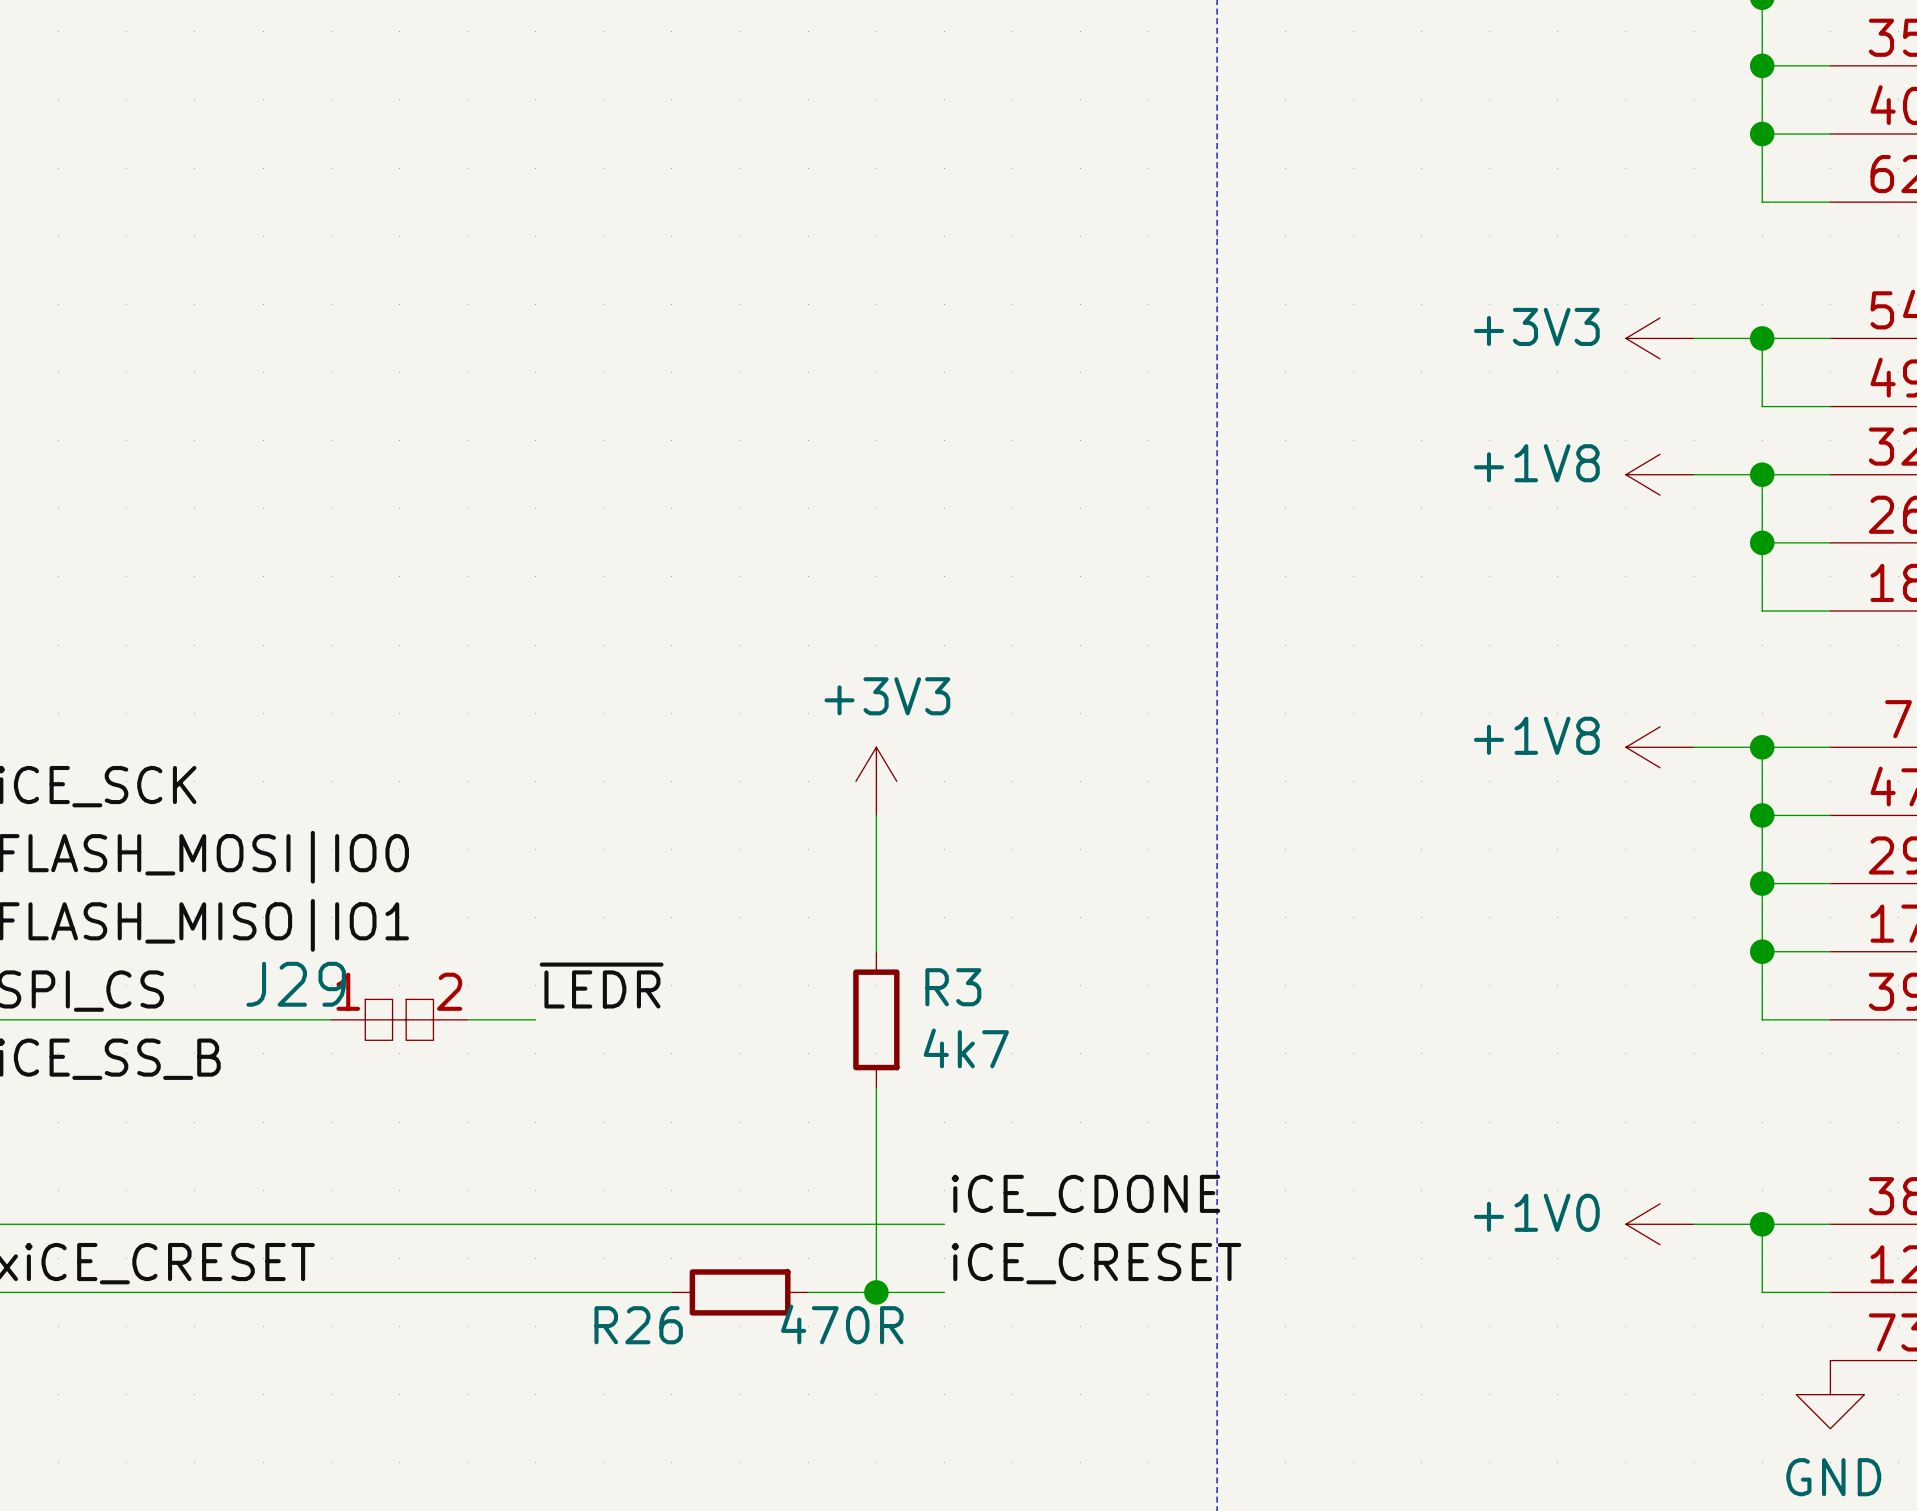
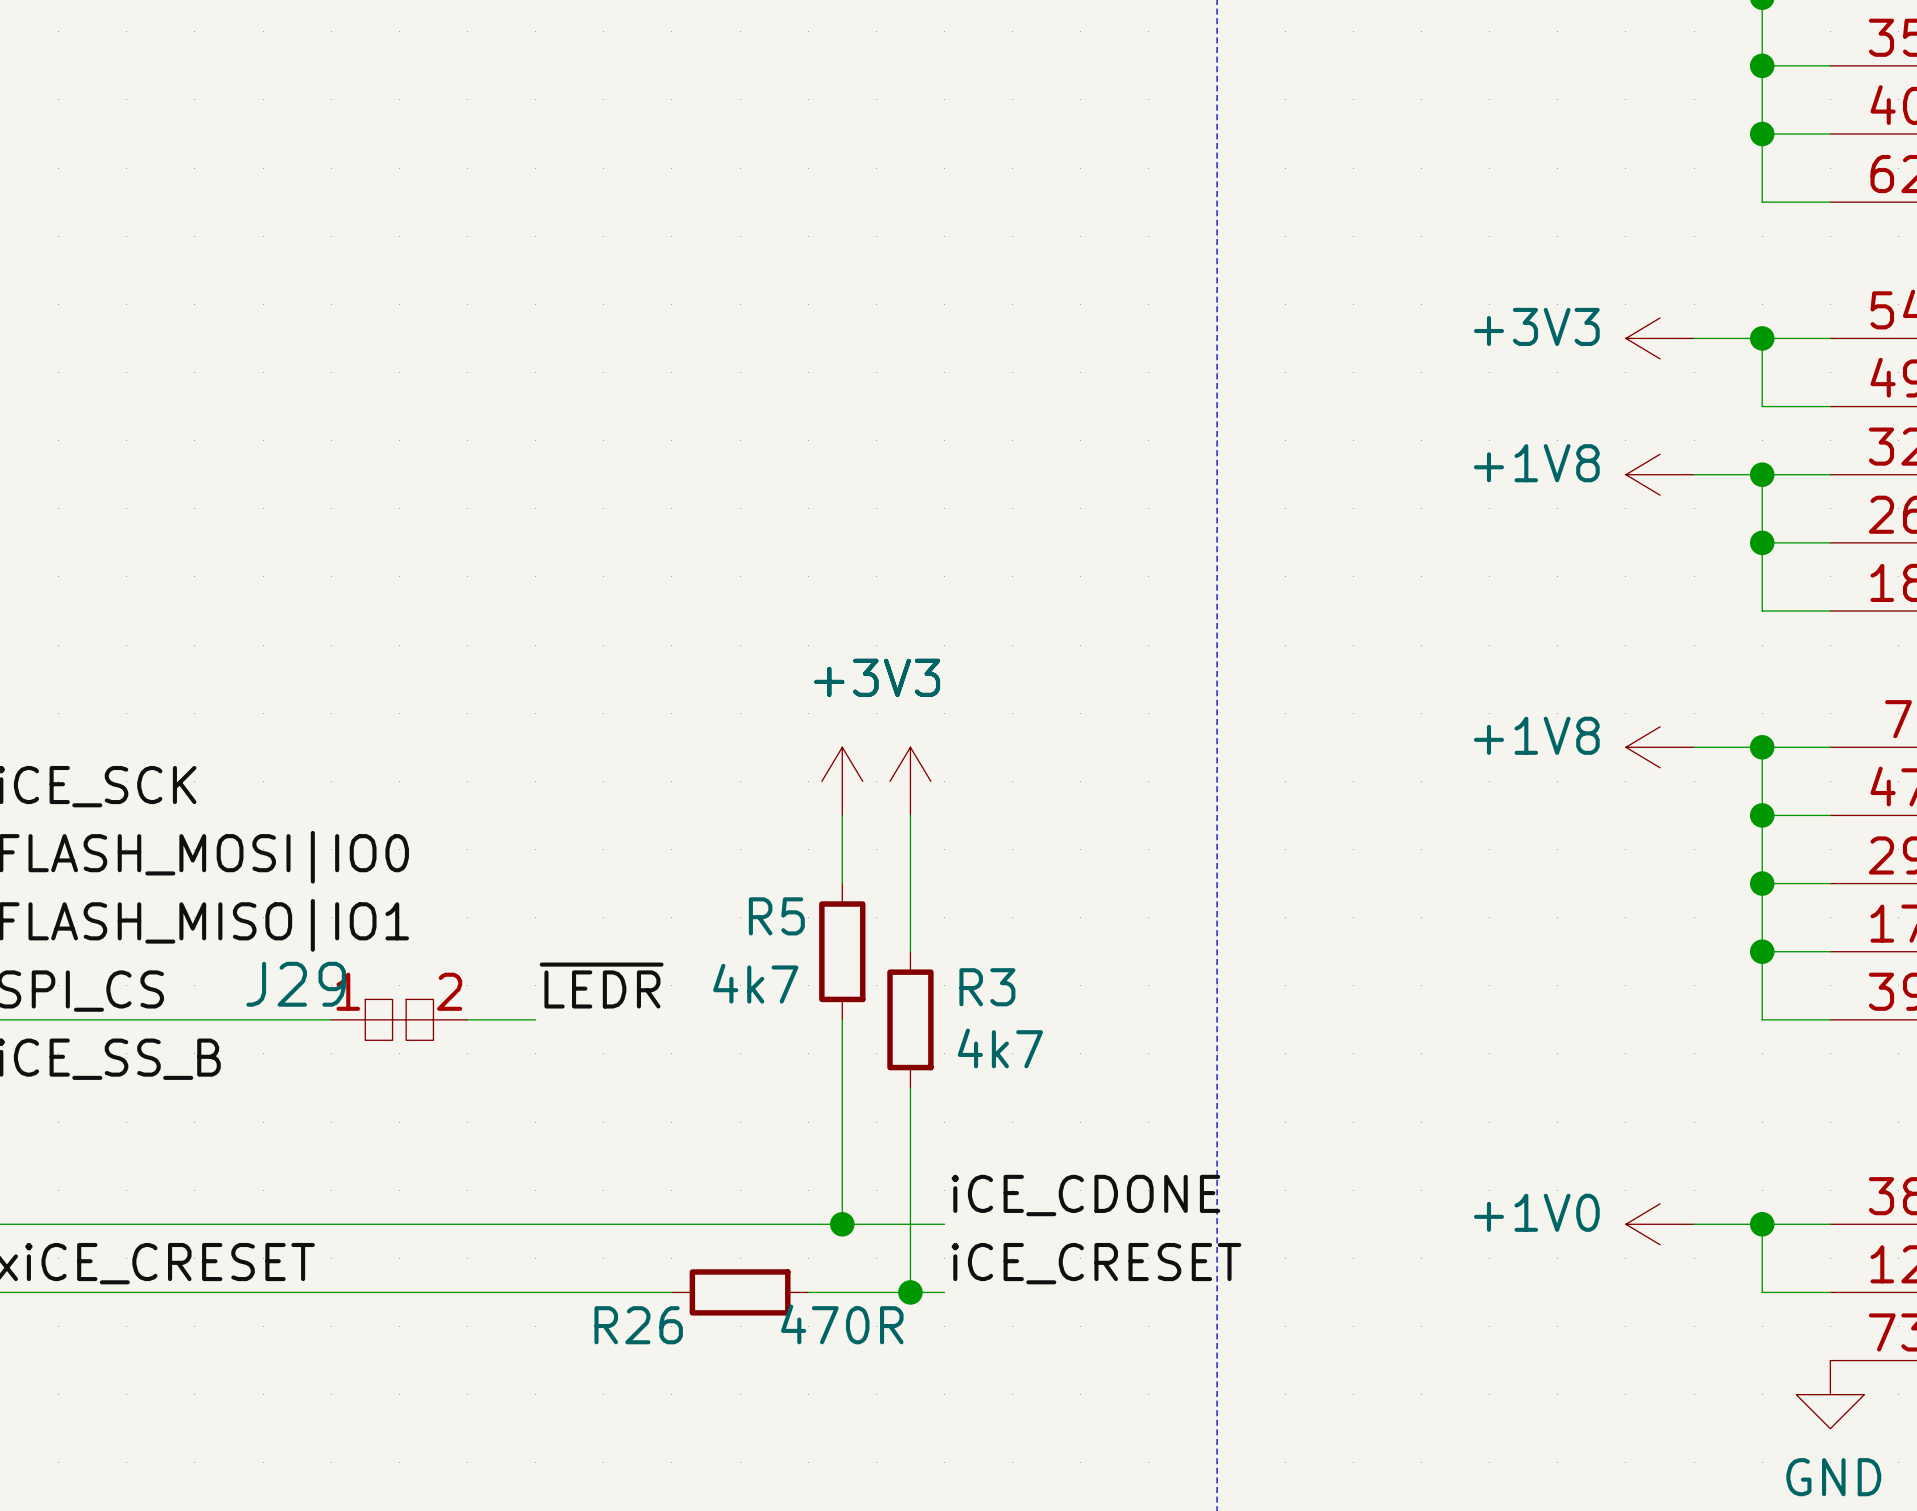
power symbol: none -> +3V3 (842, 781)
power symbol: +3V3 (876, 781) -> none
power symbol: none -> +3V3 (910, 781)
wire: none -> (842, 815) (842, 883)
wire: (876, 815) (876, 951) -> (910, 815) (910, 951)
R5: none -> 4k7 (842, 951)
wire: none -> (842, 1019) (842, 1224)
R3 position: (876, 1019) -> (910, 1019)
wire: (876, 1088) (876, 1292) -> (910, 1088) (910, 1292)
junction: none -> (842, 1224)
junction position: (876, 1292) -> (910, 1292)

